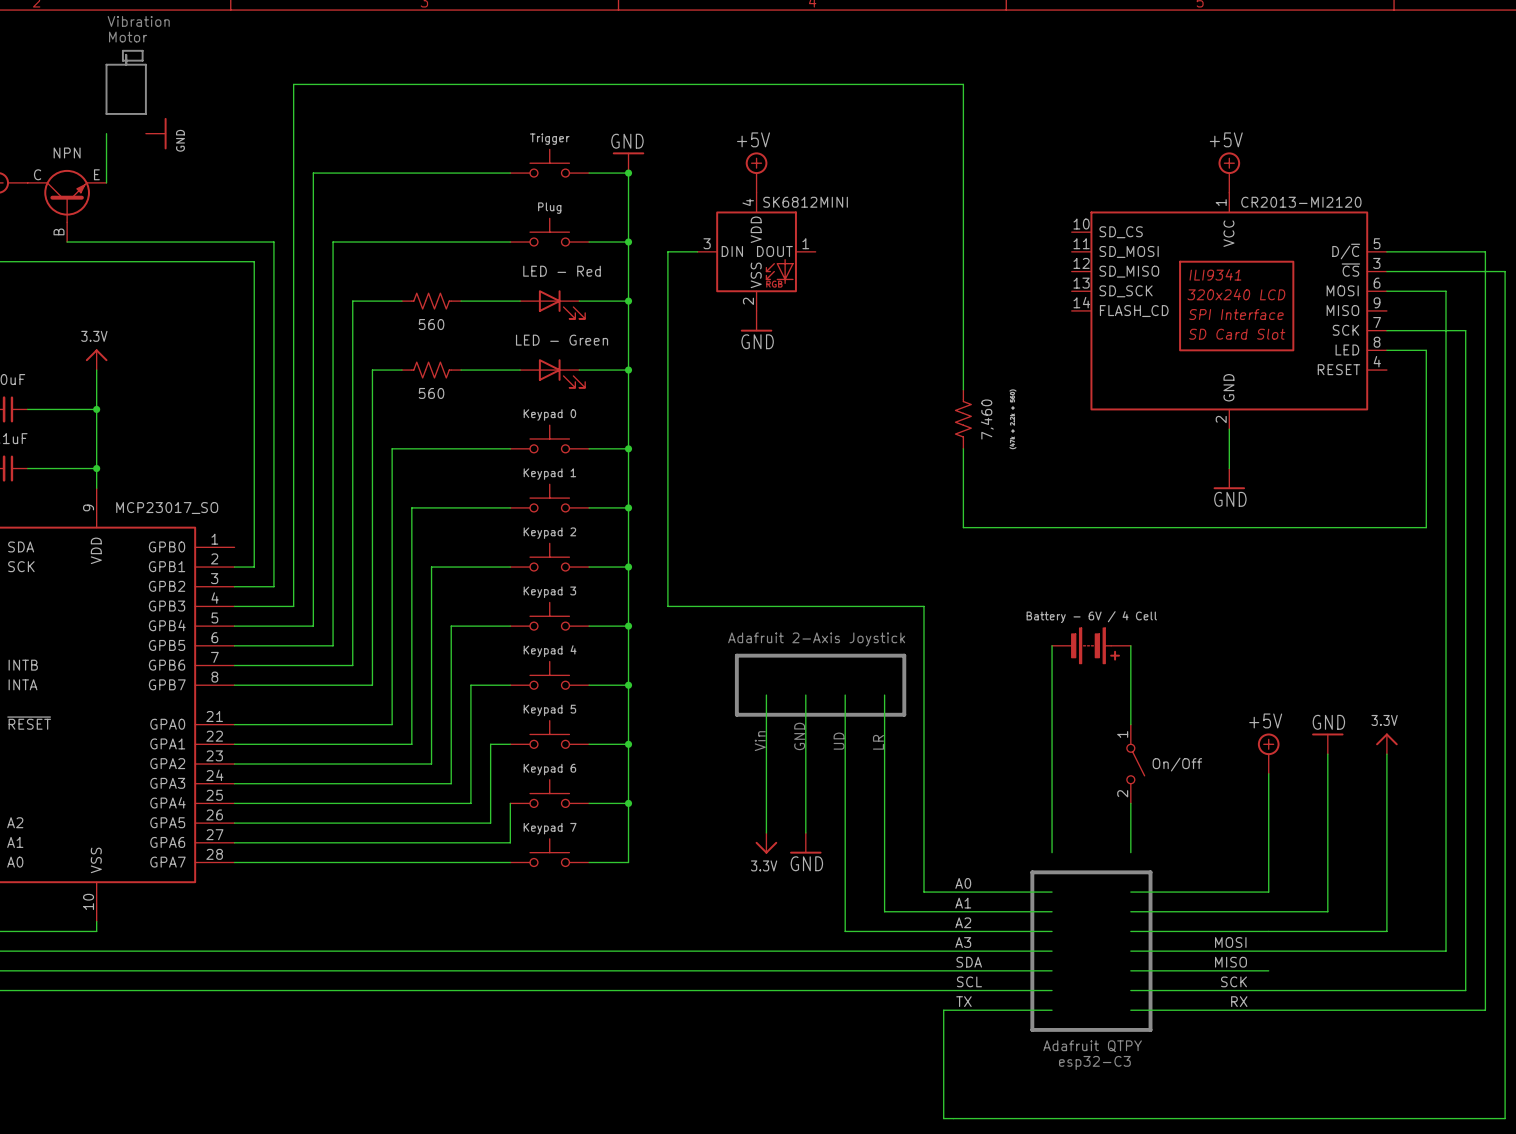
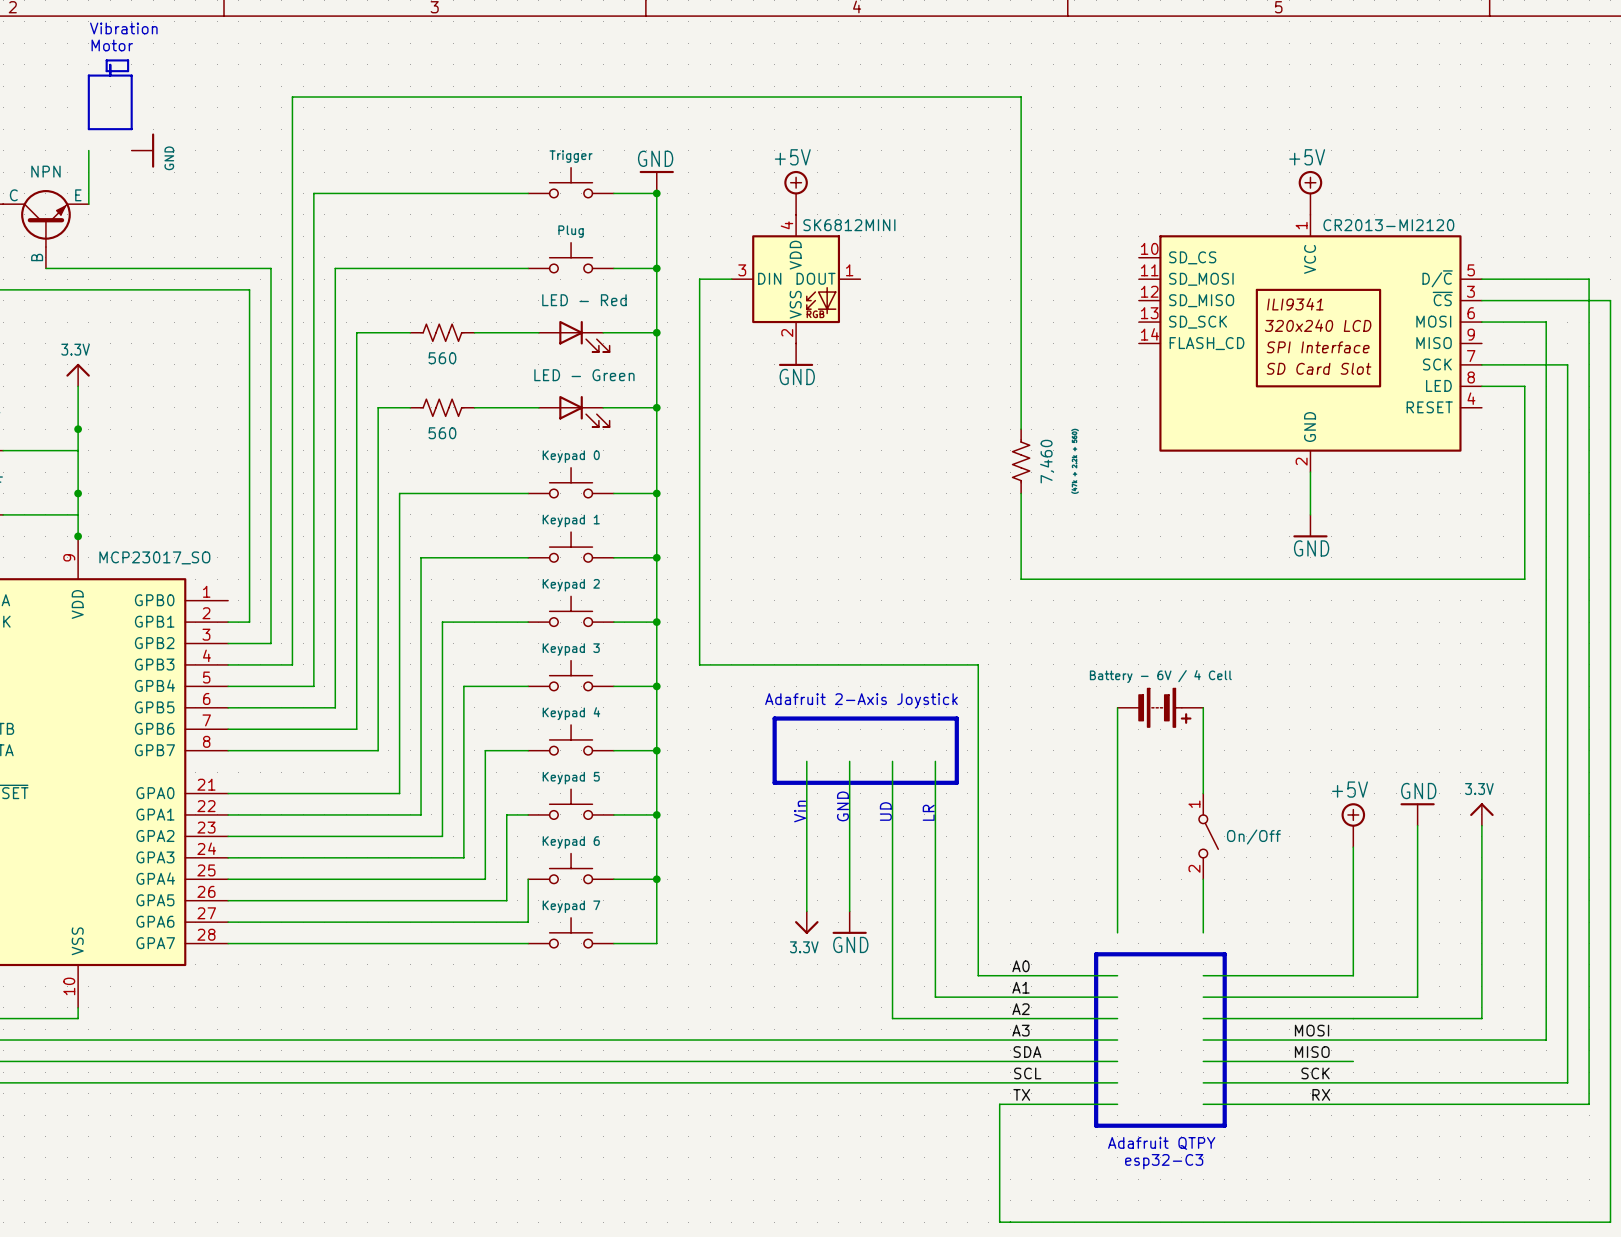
power symbol position: 3.3V (96, 359) -> 3.3V (78, 375)
junction: none -> (78, 429)
junction: (96, 409) -> none
junction: none -> (78, 493)
junction: (96, 468) -> none
junction: none -> (78, 536)

